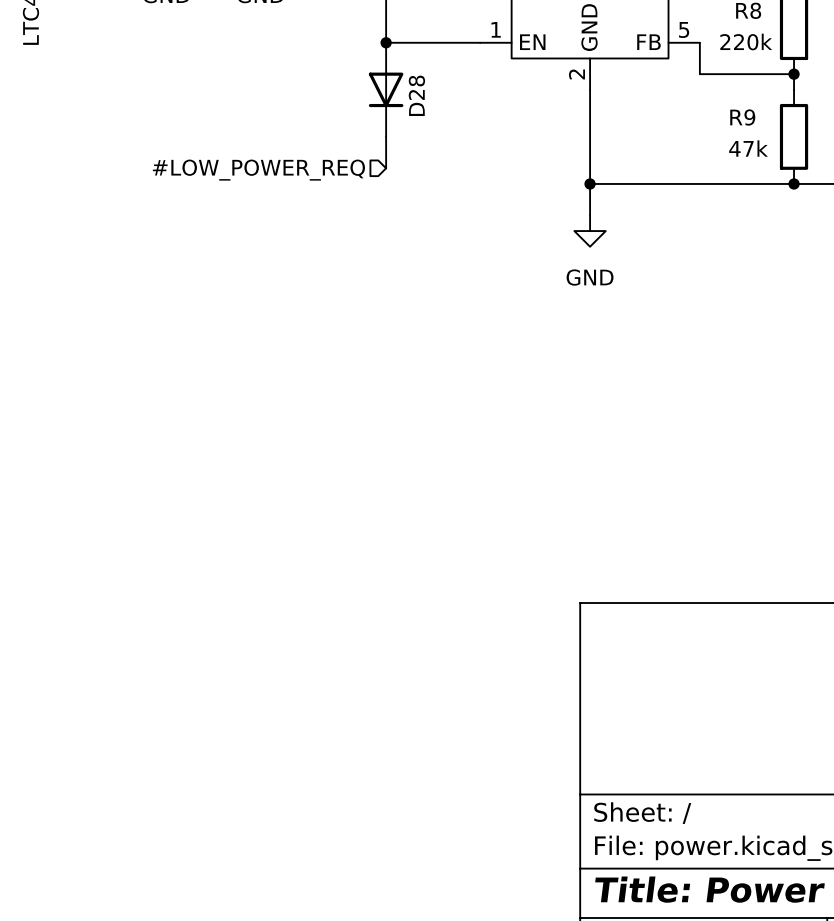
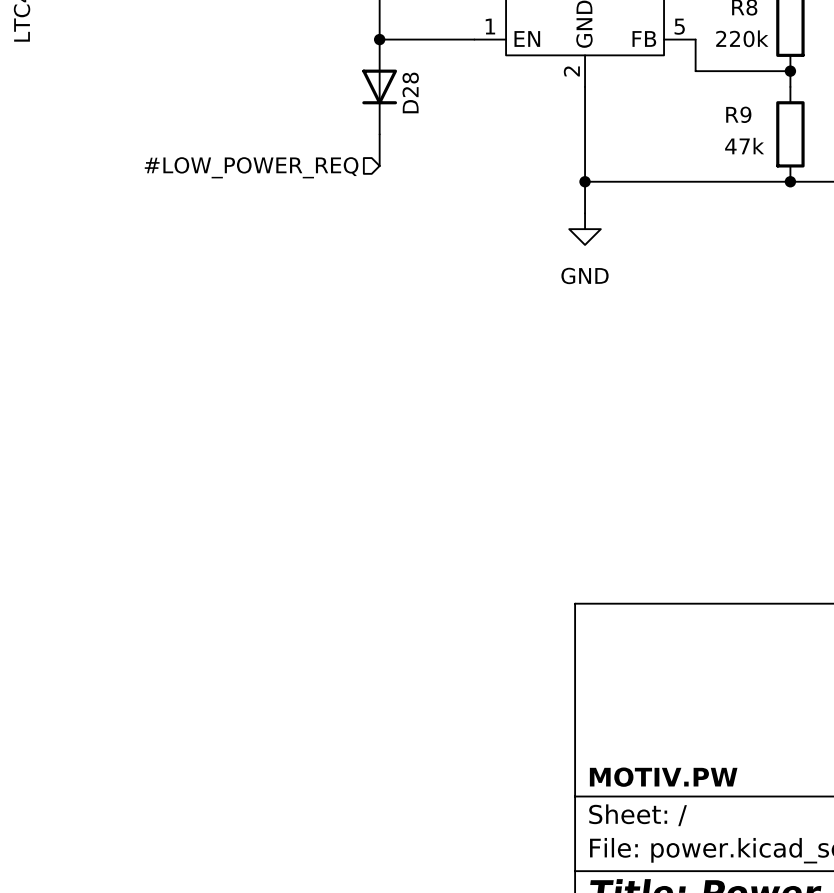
title block: none -> MOTIV.PW (663, 777)

